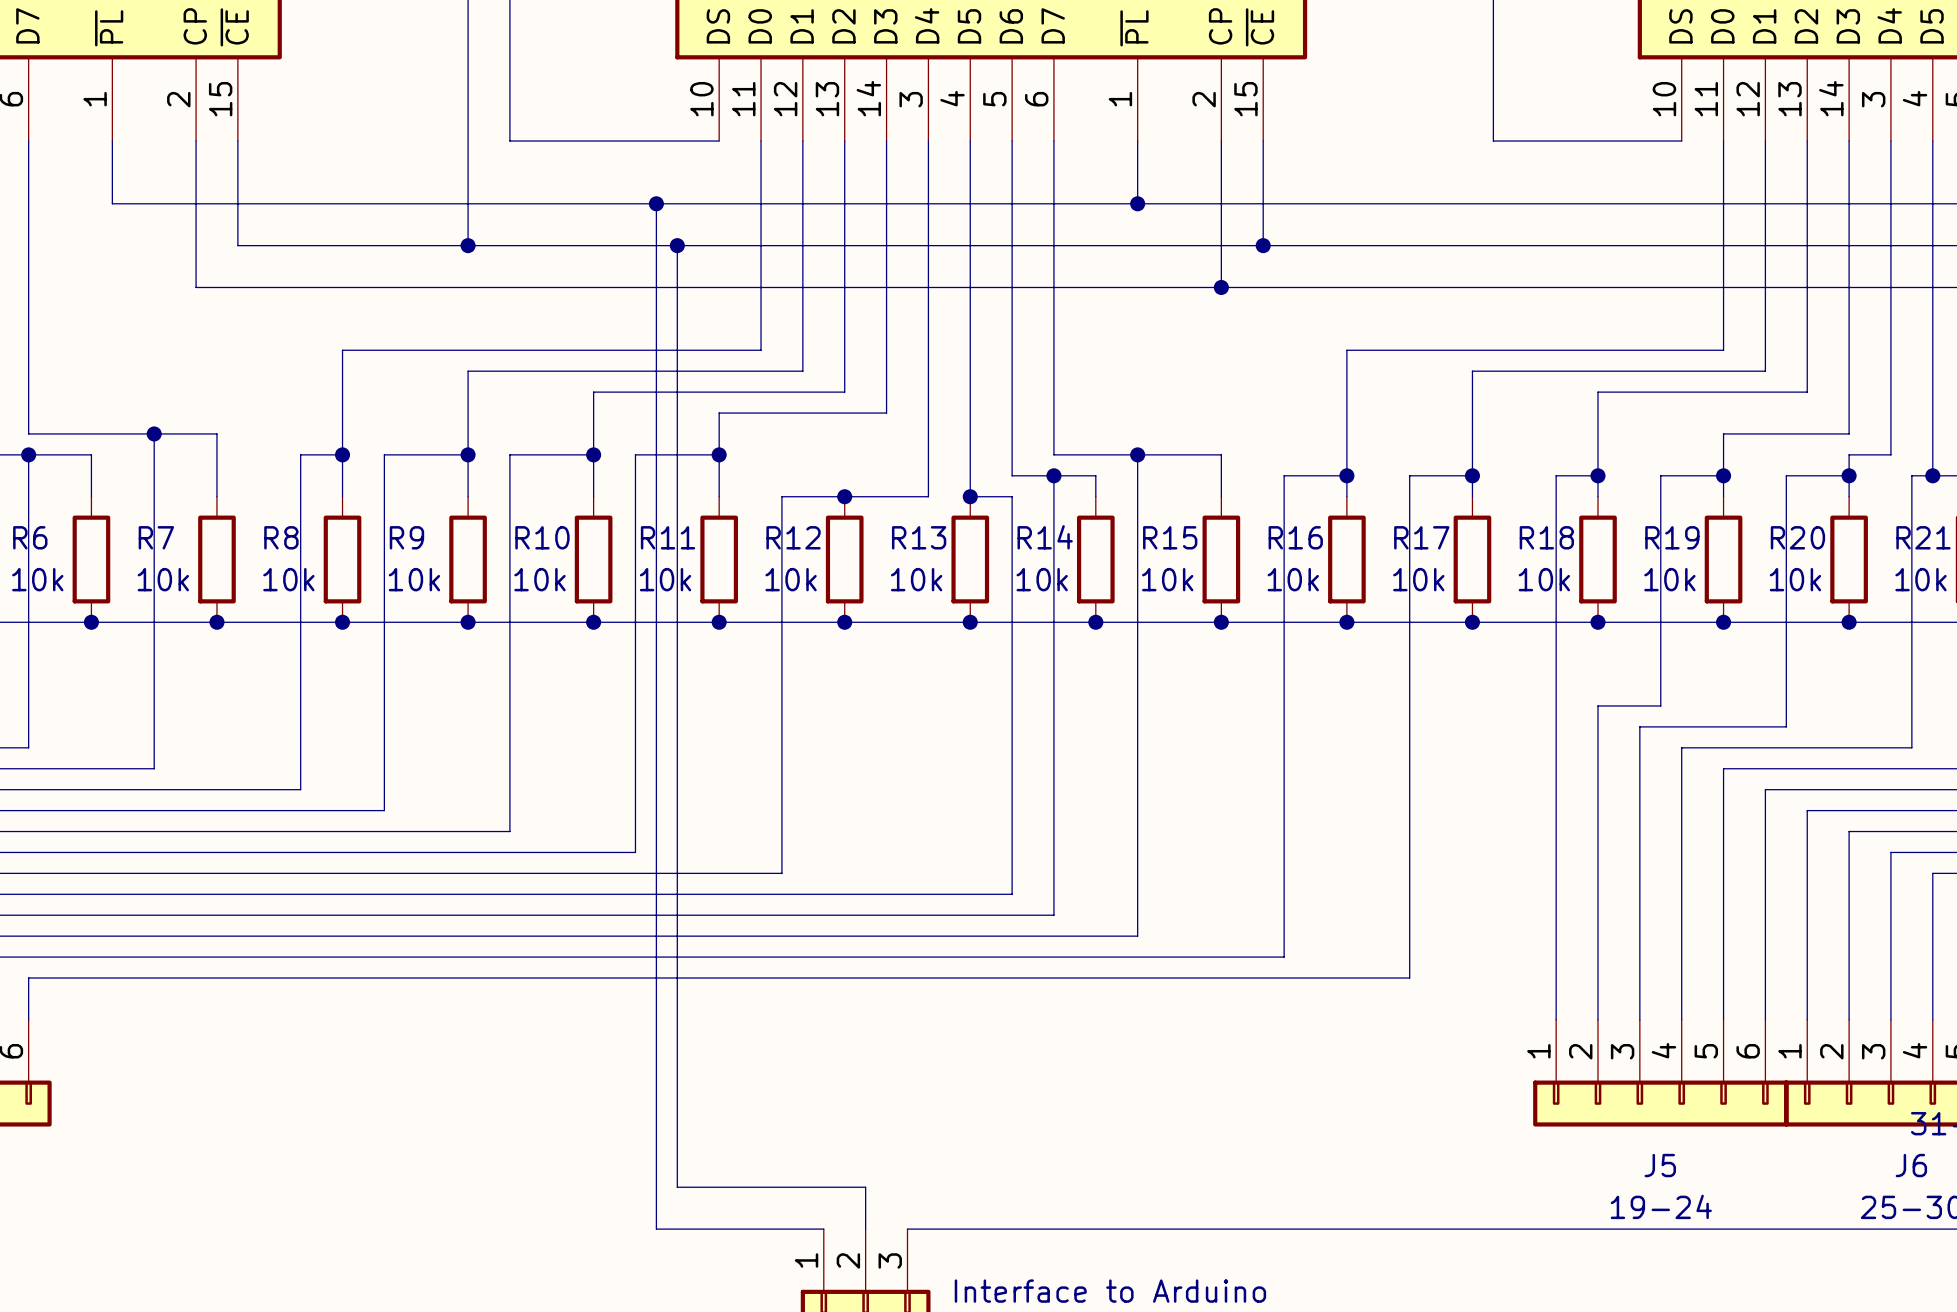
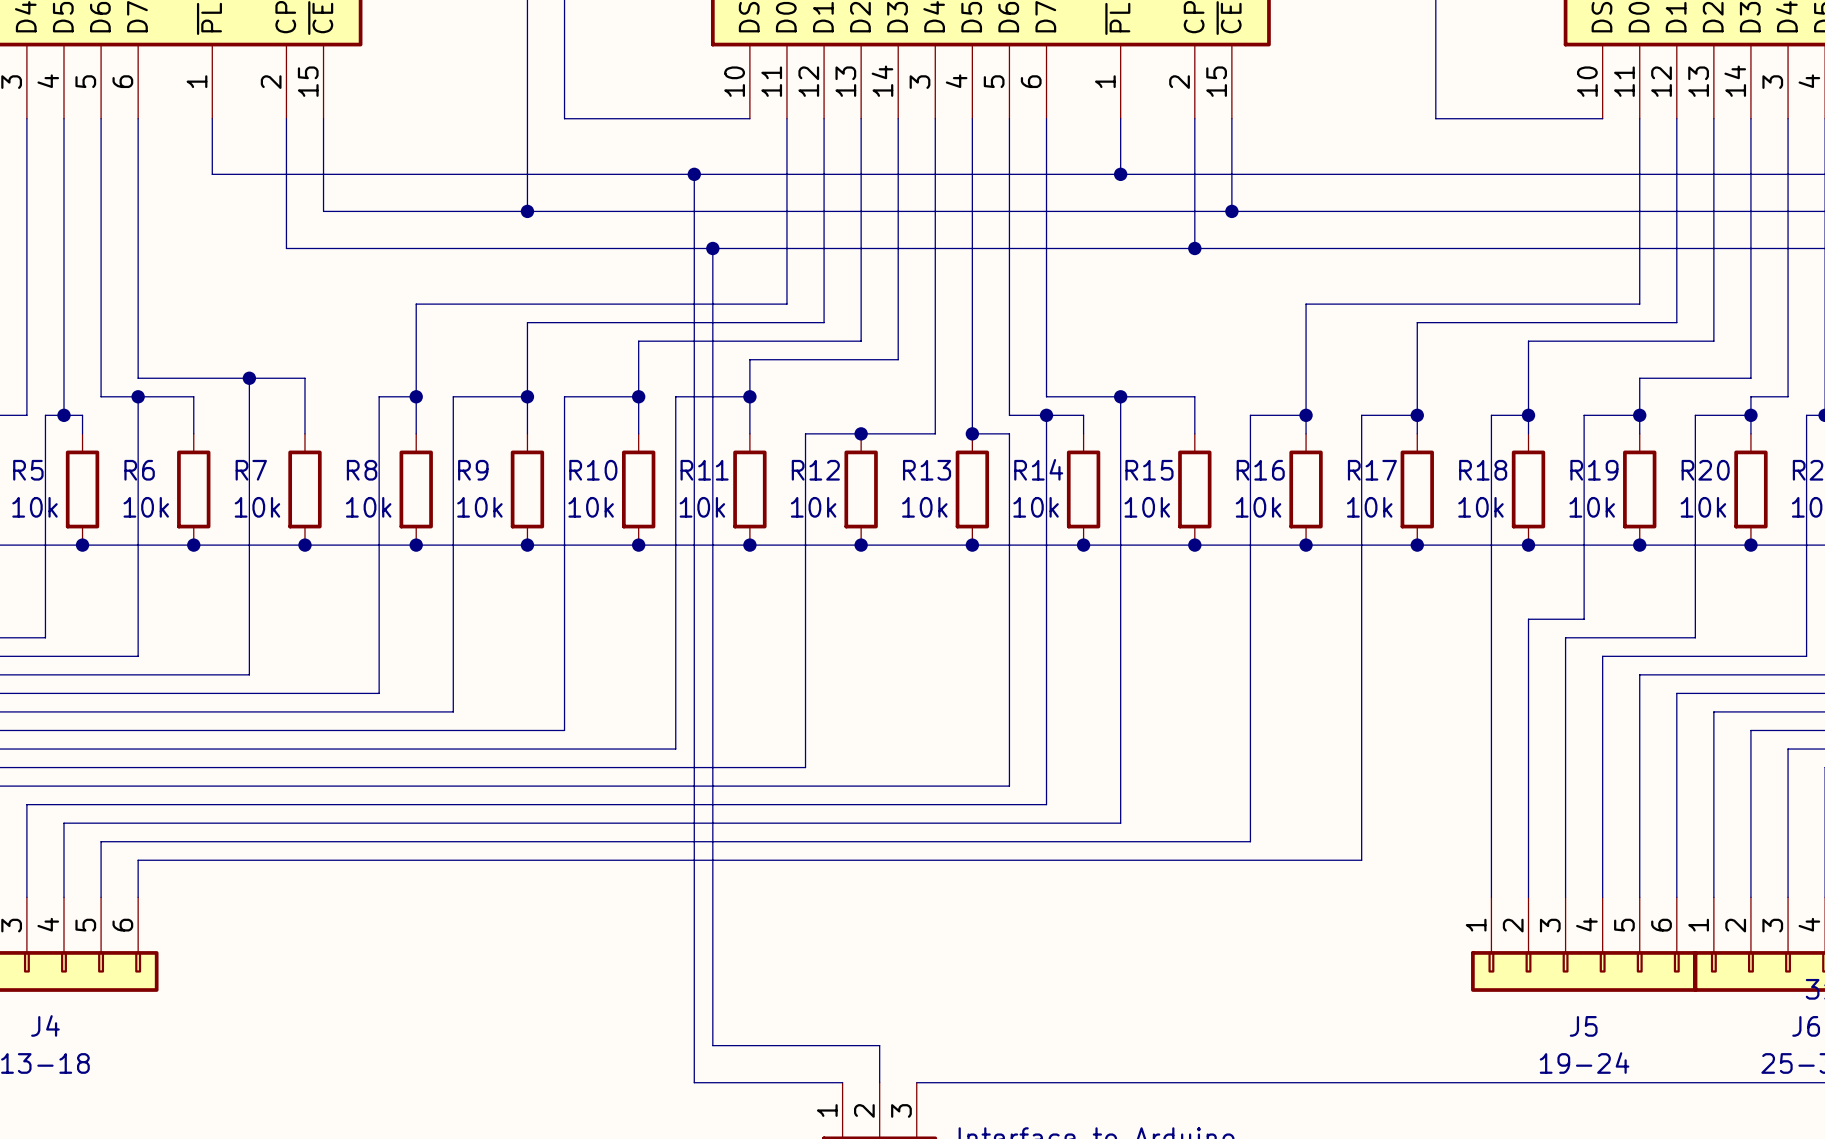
wire: (677, 245) (677, 287) -> none
junction position: (677, 245) -> (712, 248)

